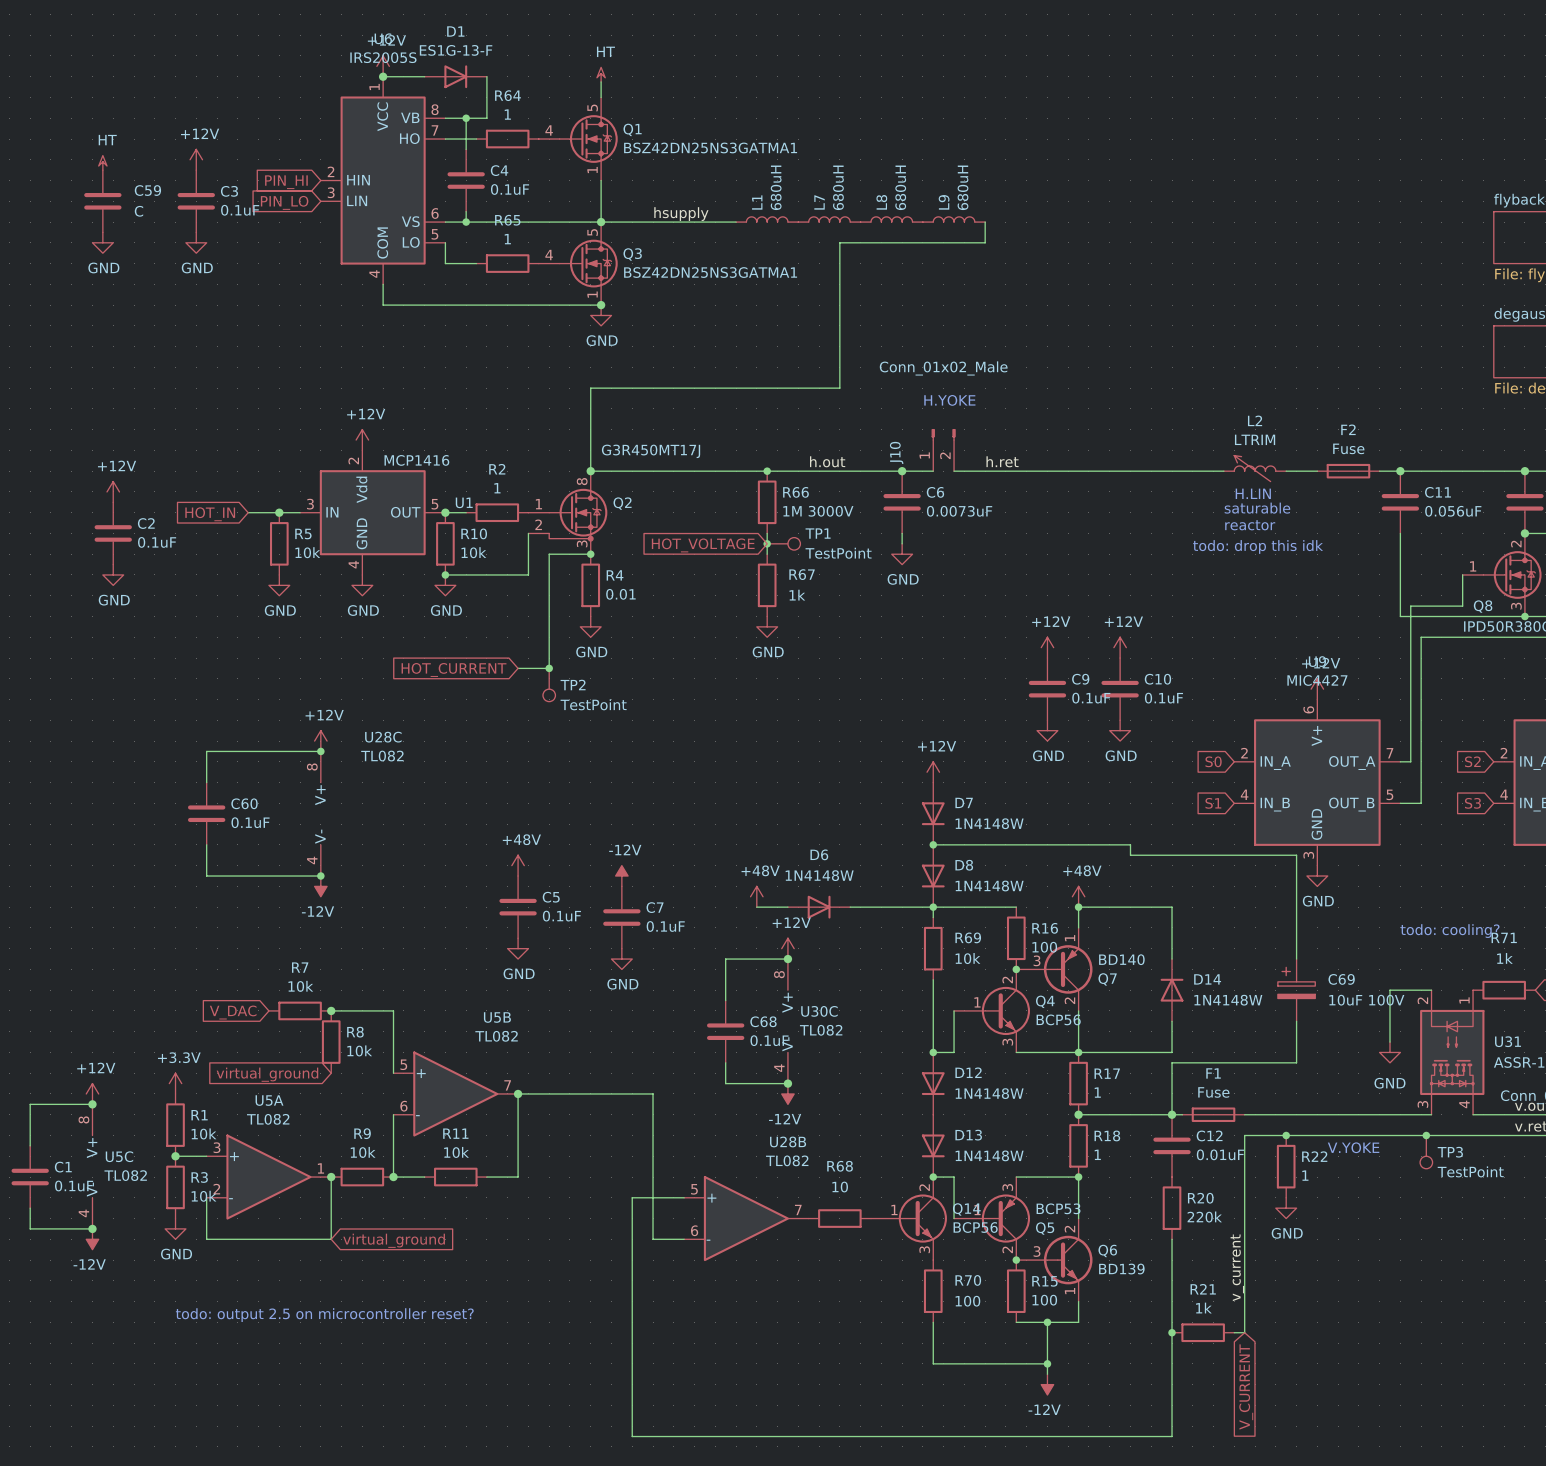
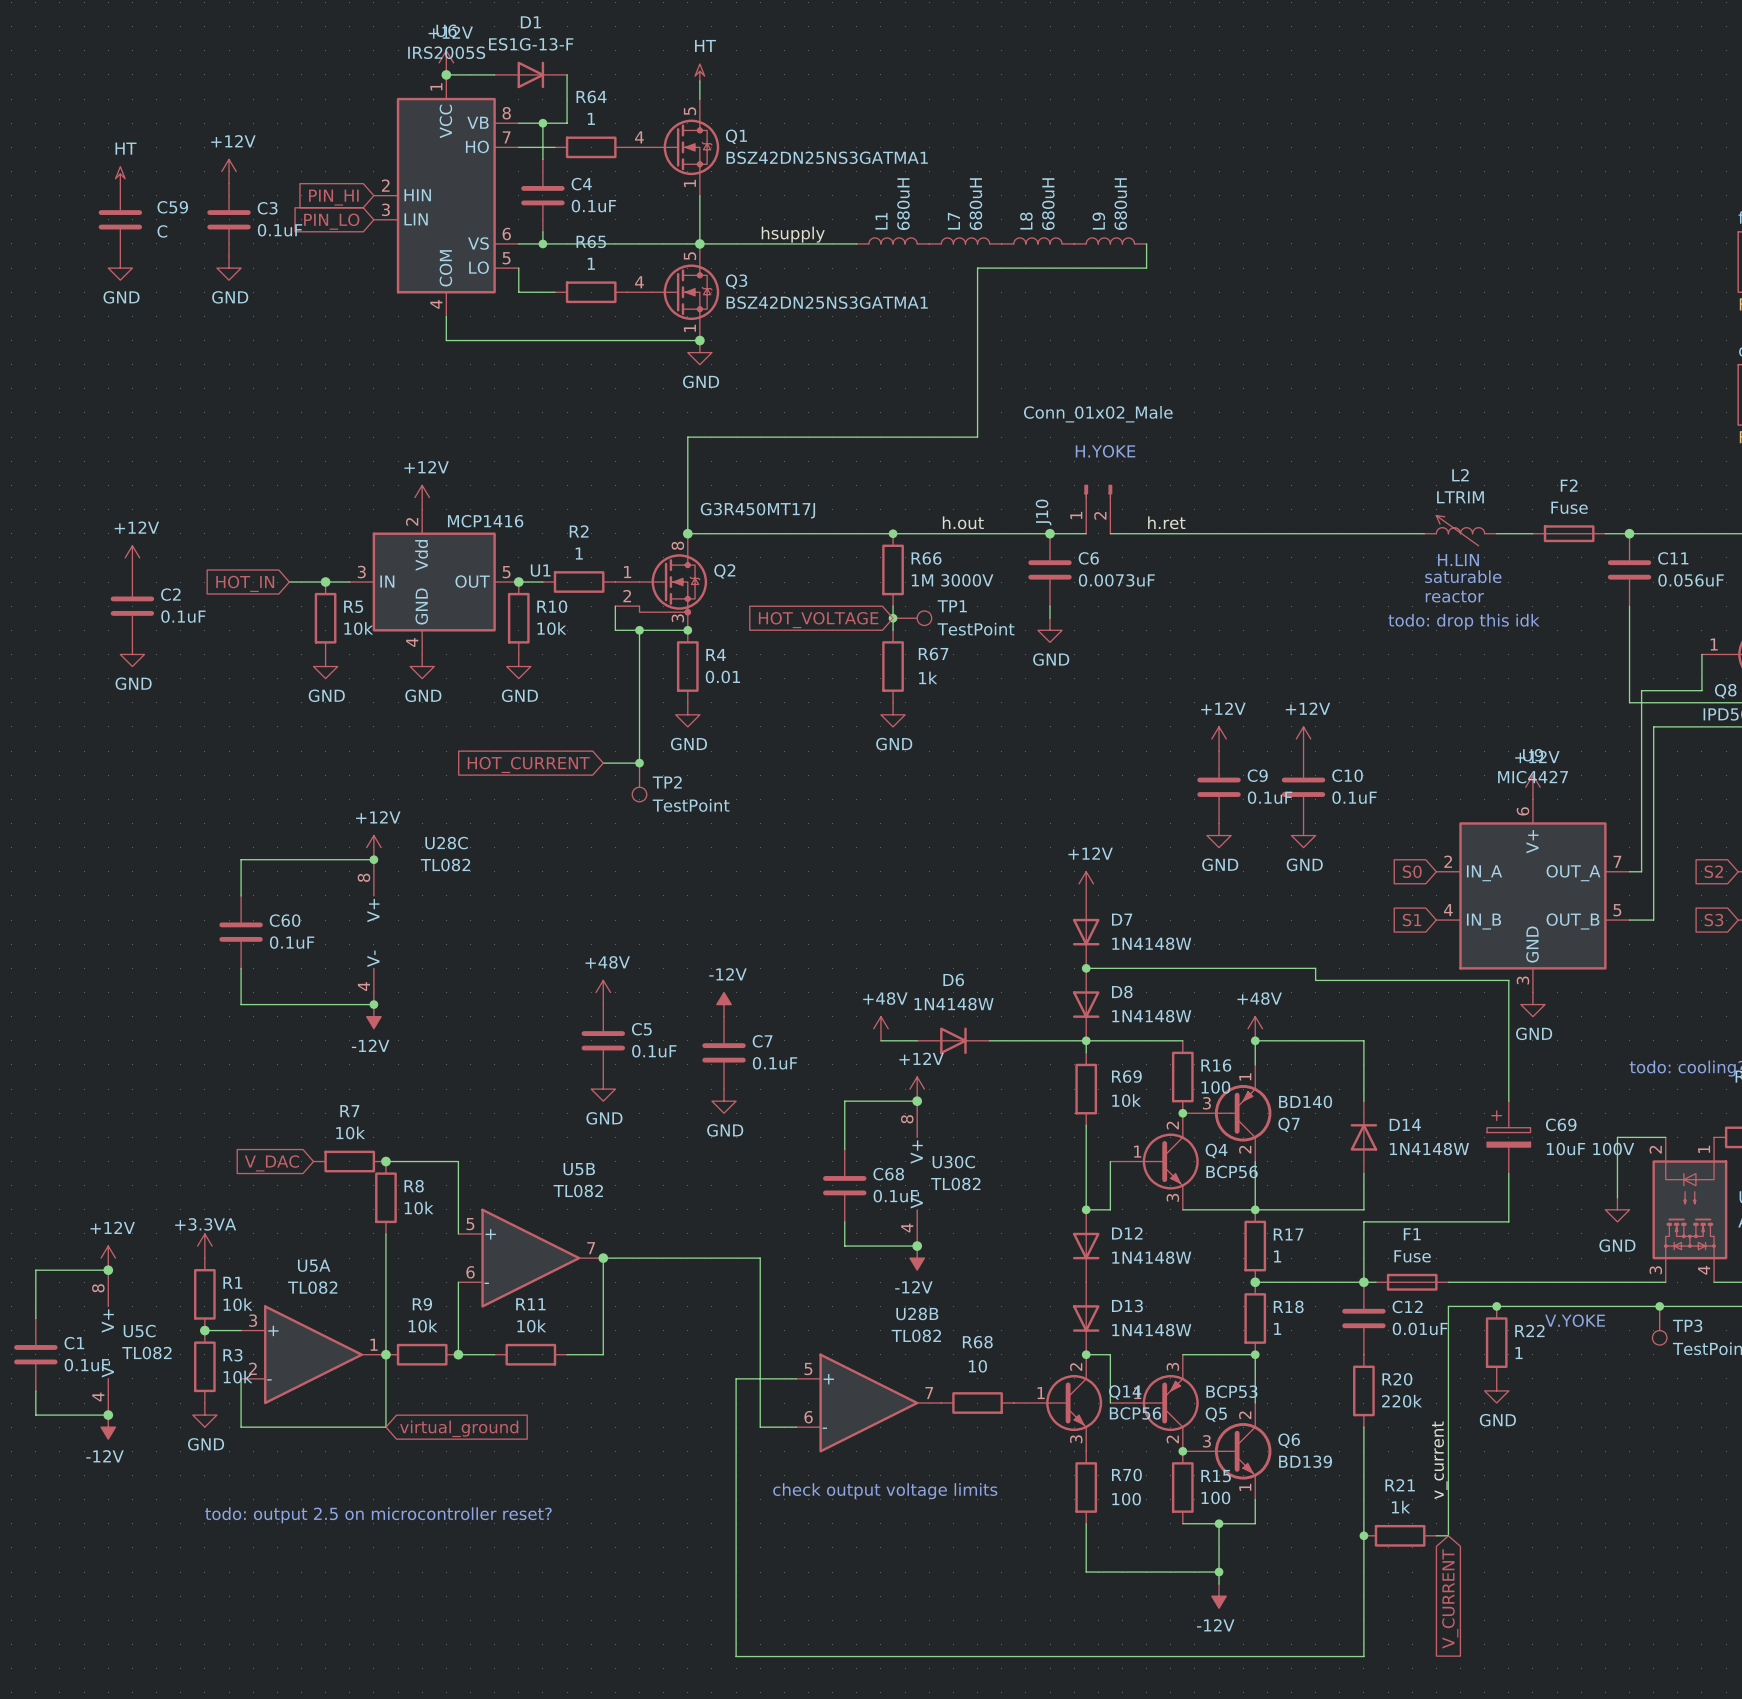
wire: (528, 554) (528, 574) (445, 574) -> (615, 630) (639, 630)
junction: none -> (639, 630)
junction: (445, 574) -> none
wire: none -> (385, 1233) (385, 1354)
global label: virtual_ground (267, 1074) -> none
power symbol: +3.3V (175, 1083) -> +3.3VA (204, 1246)
text: none -> check output voltage limits (885, 1491)

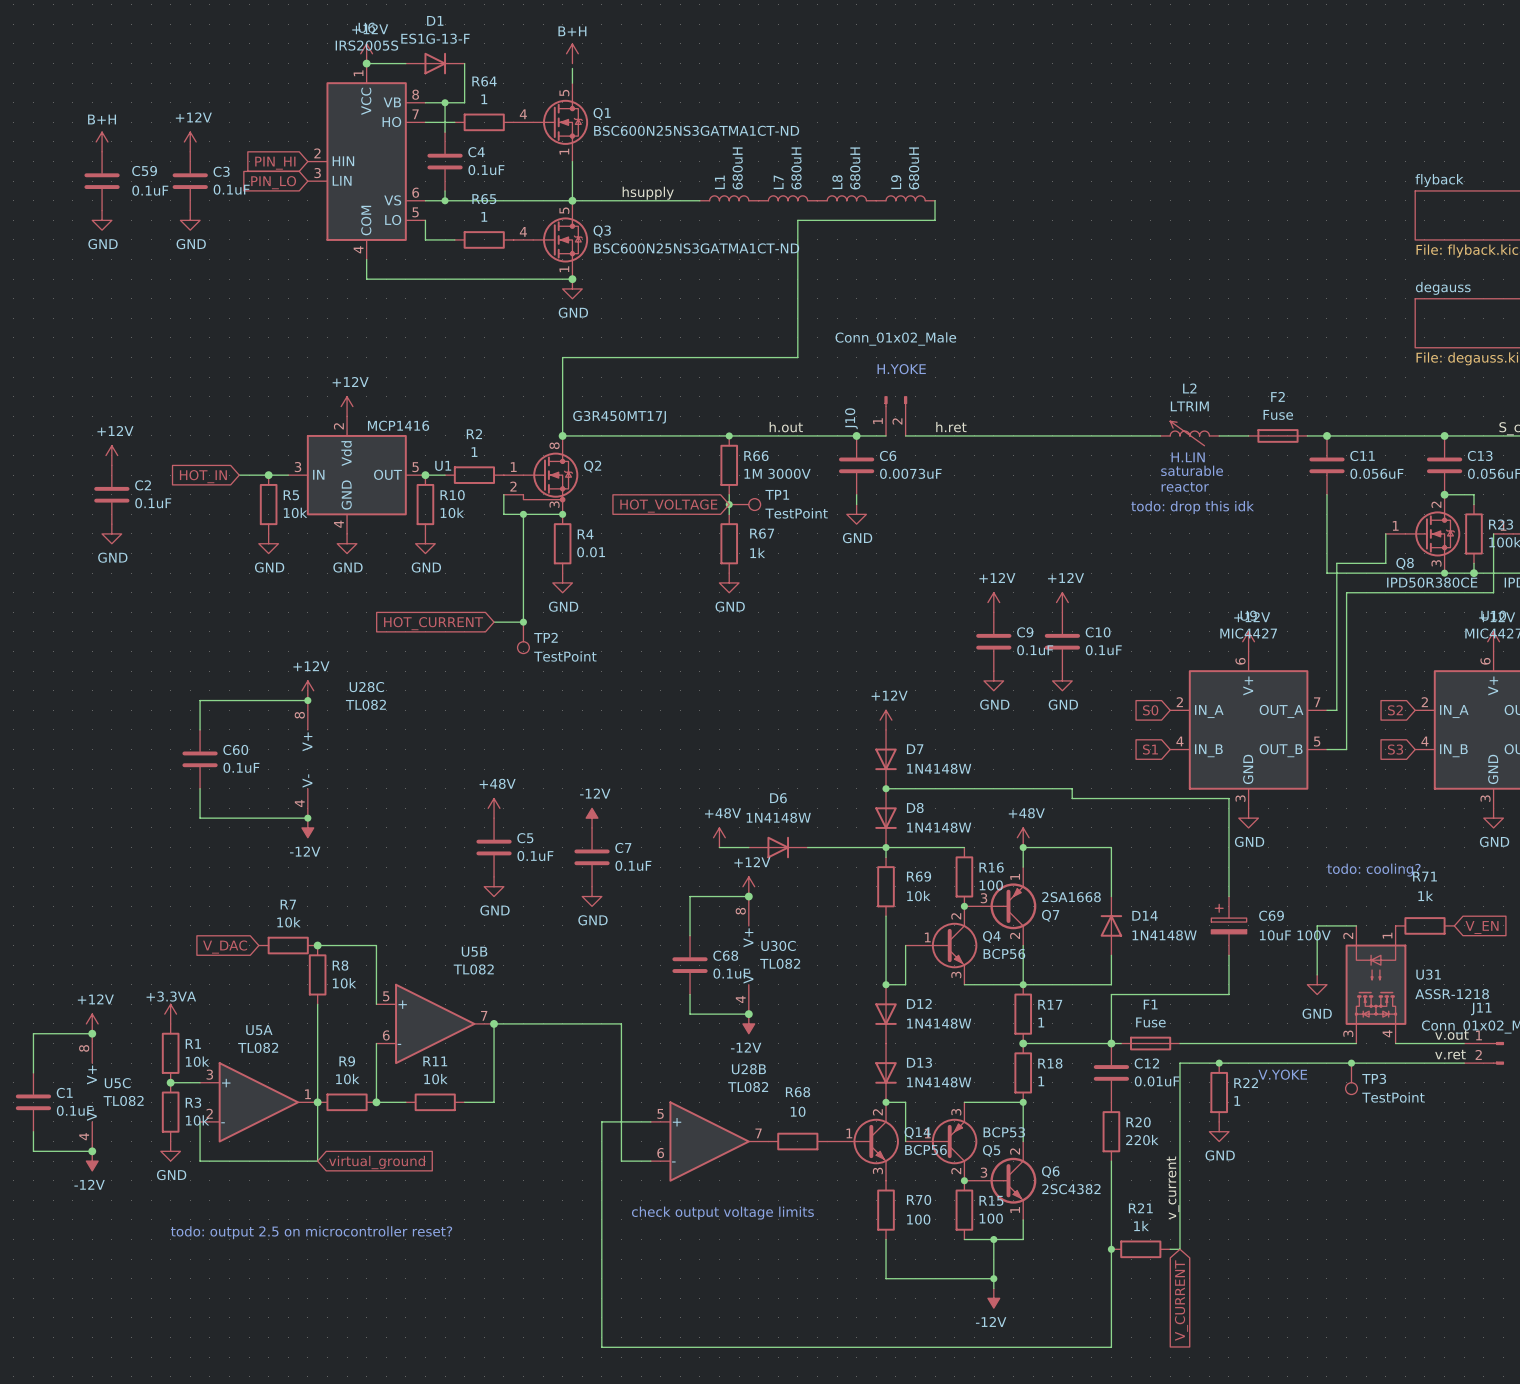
power symbol: none -> B+H (572, 53)
power symbol: HT (699, 72) -> none
Q1 value: BSZ42DN25NS3GATMA1 (827, 157) -> BSC600N25NS3GATMA1CT-ND (696, 130)
power symbol: HT (120, 175) -> B+H (102, 141)
C59 value: C (162, 231) -> 0.1uF (150, 190)
Q3 value: BSZ42DN25NS3GATMA1 (827, 302) -> BSC600N25NS3GATMA1CT-ND (696, 248)
Q7 value: BD140 (1305, 1101) -> 2SA1668 (1071, 897)
Q6 value: BD139 (1305, 1461) -> 2SC4382 (1071, 1189)

